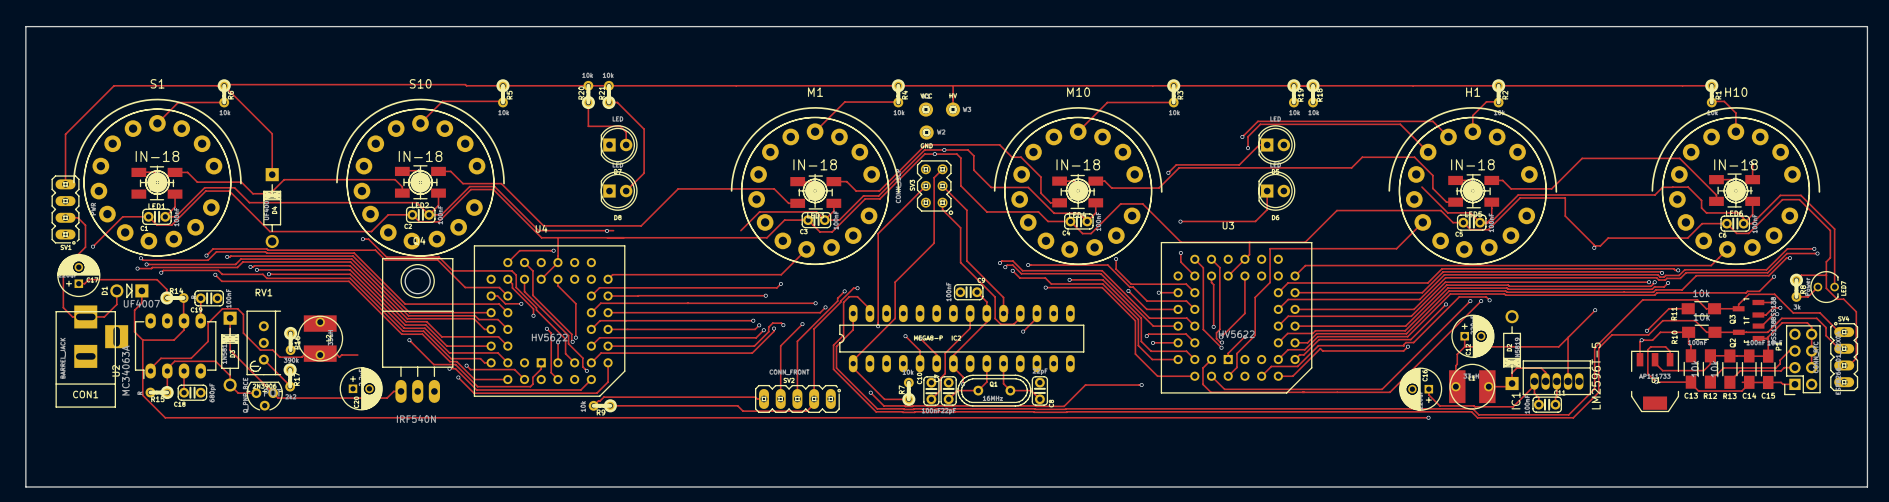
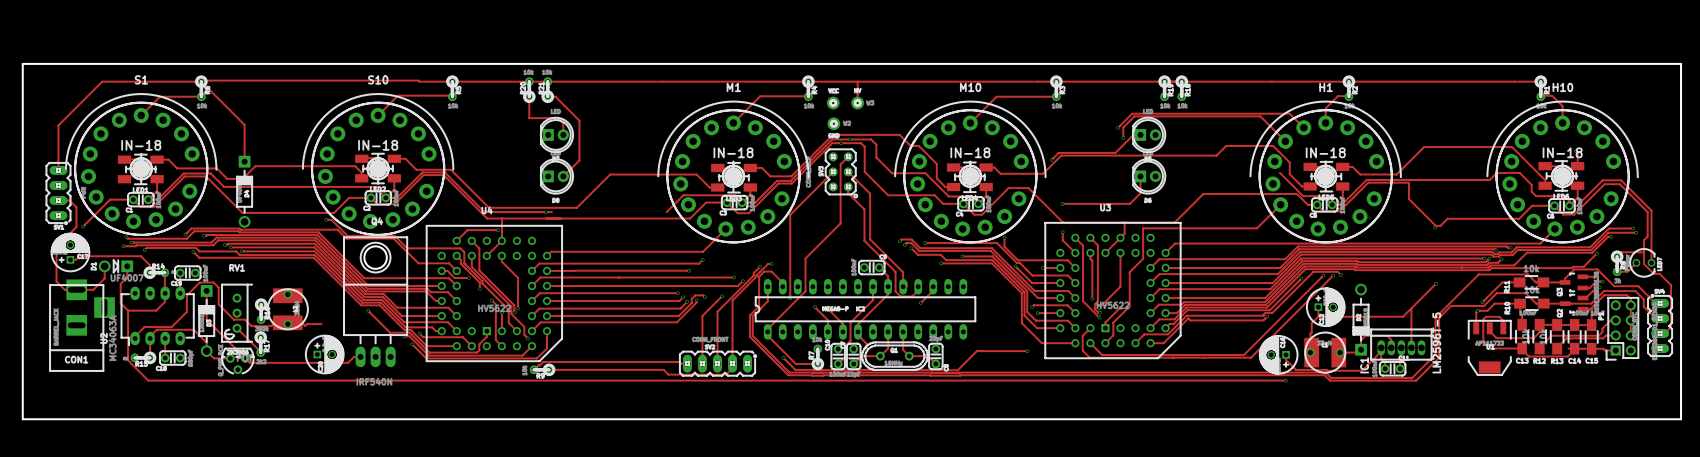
board edge: (25, 66) (25, 26) (1867, 26) (1867, 66) -> (22, 63) (1681, 63)
board edge: (25, 460) (25, 486) (1867, 486) (1867, 460) -> (22, 419) (1681, 419)

